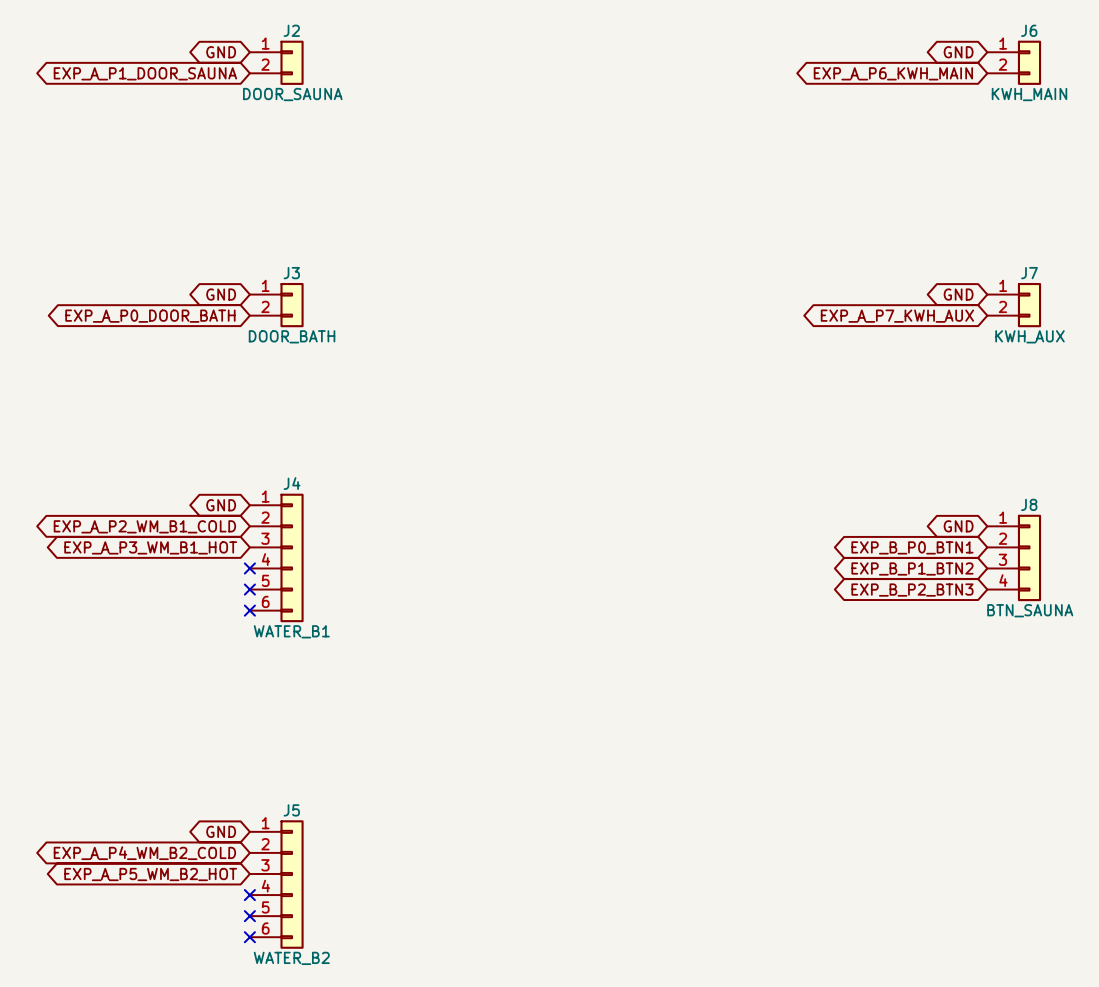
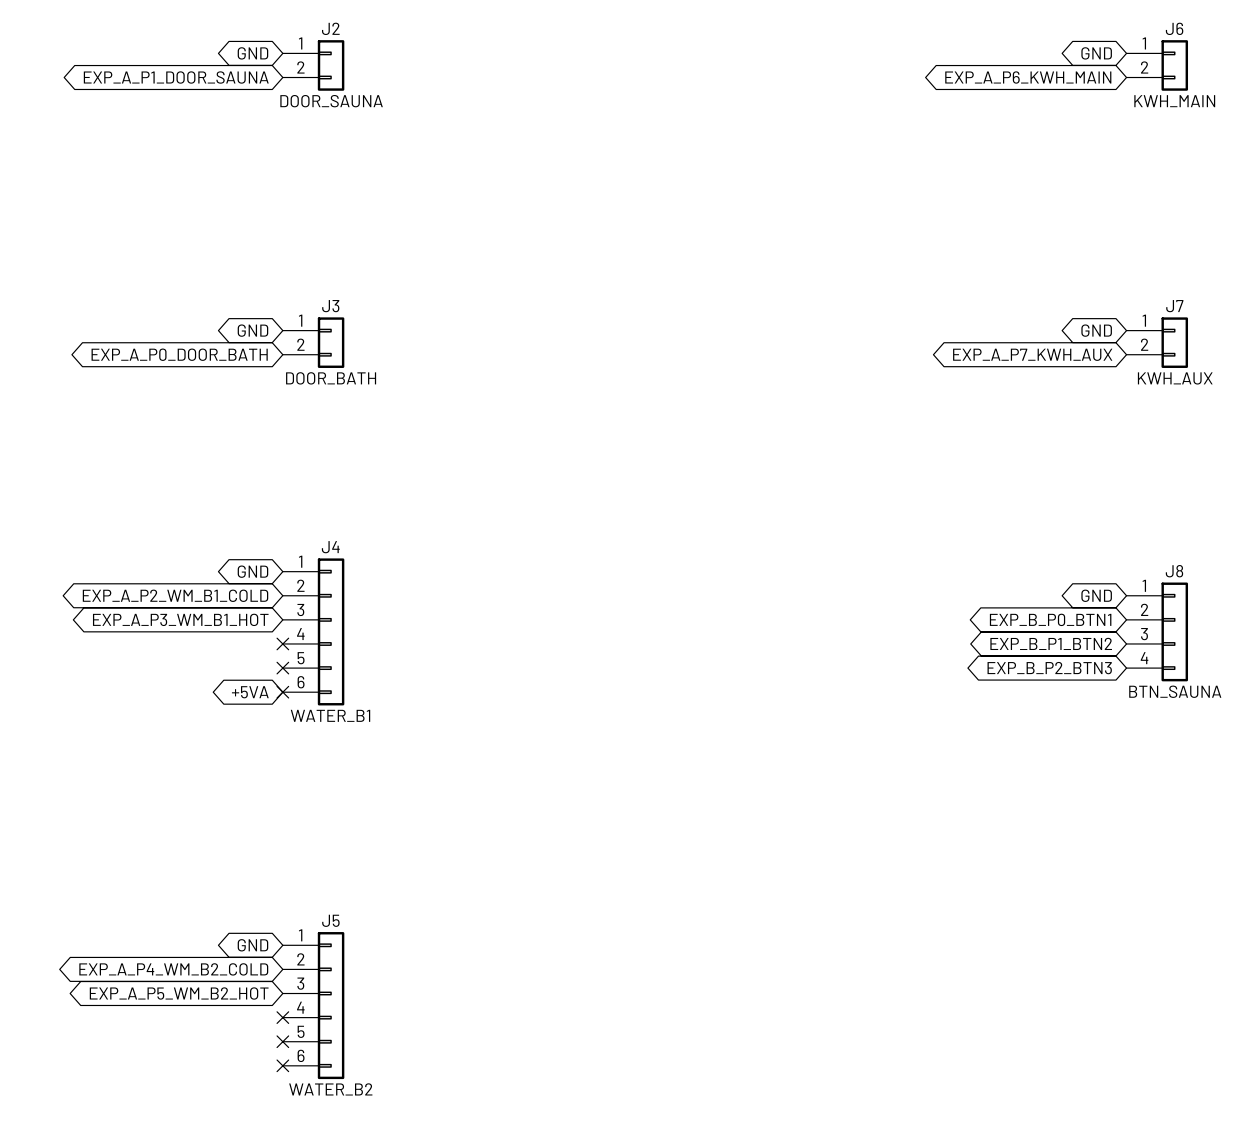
global label: none -> +5VA (250, 692)

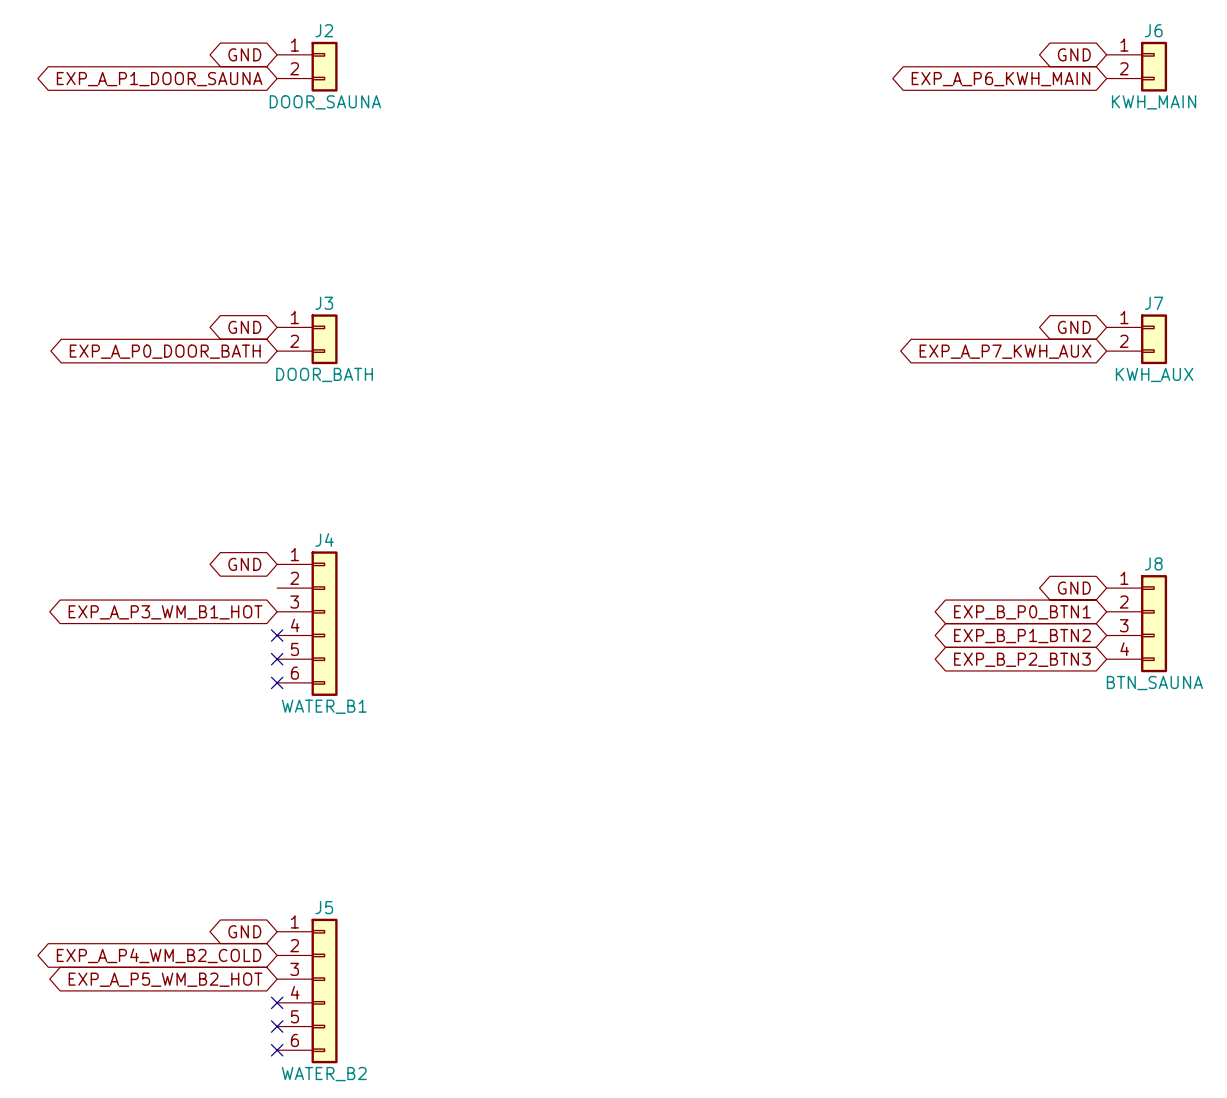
global label: EXP_A_P2_WM_B1_COLD (175, 595) -> none
global label: +5VA (250, 692) -> none

